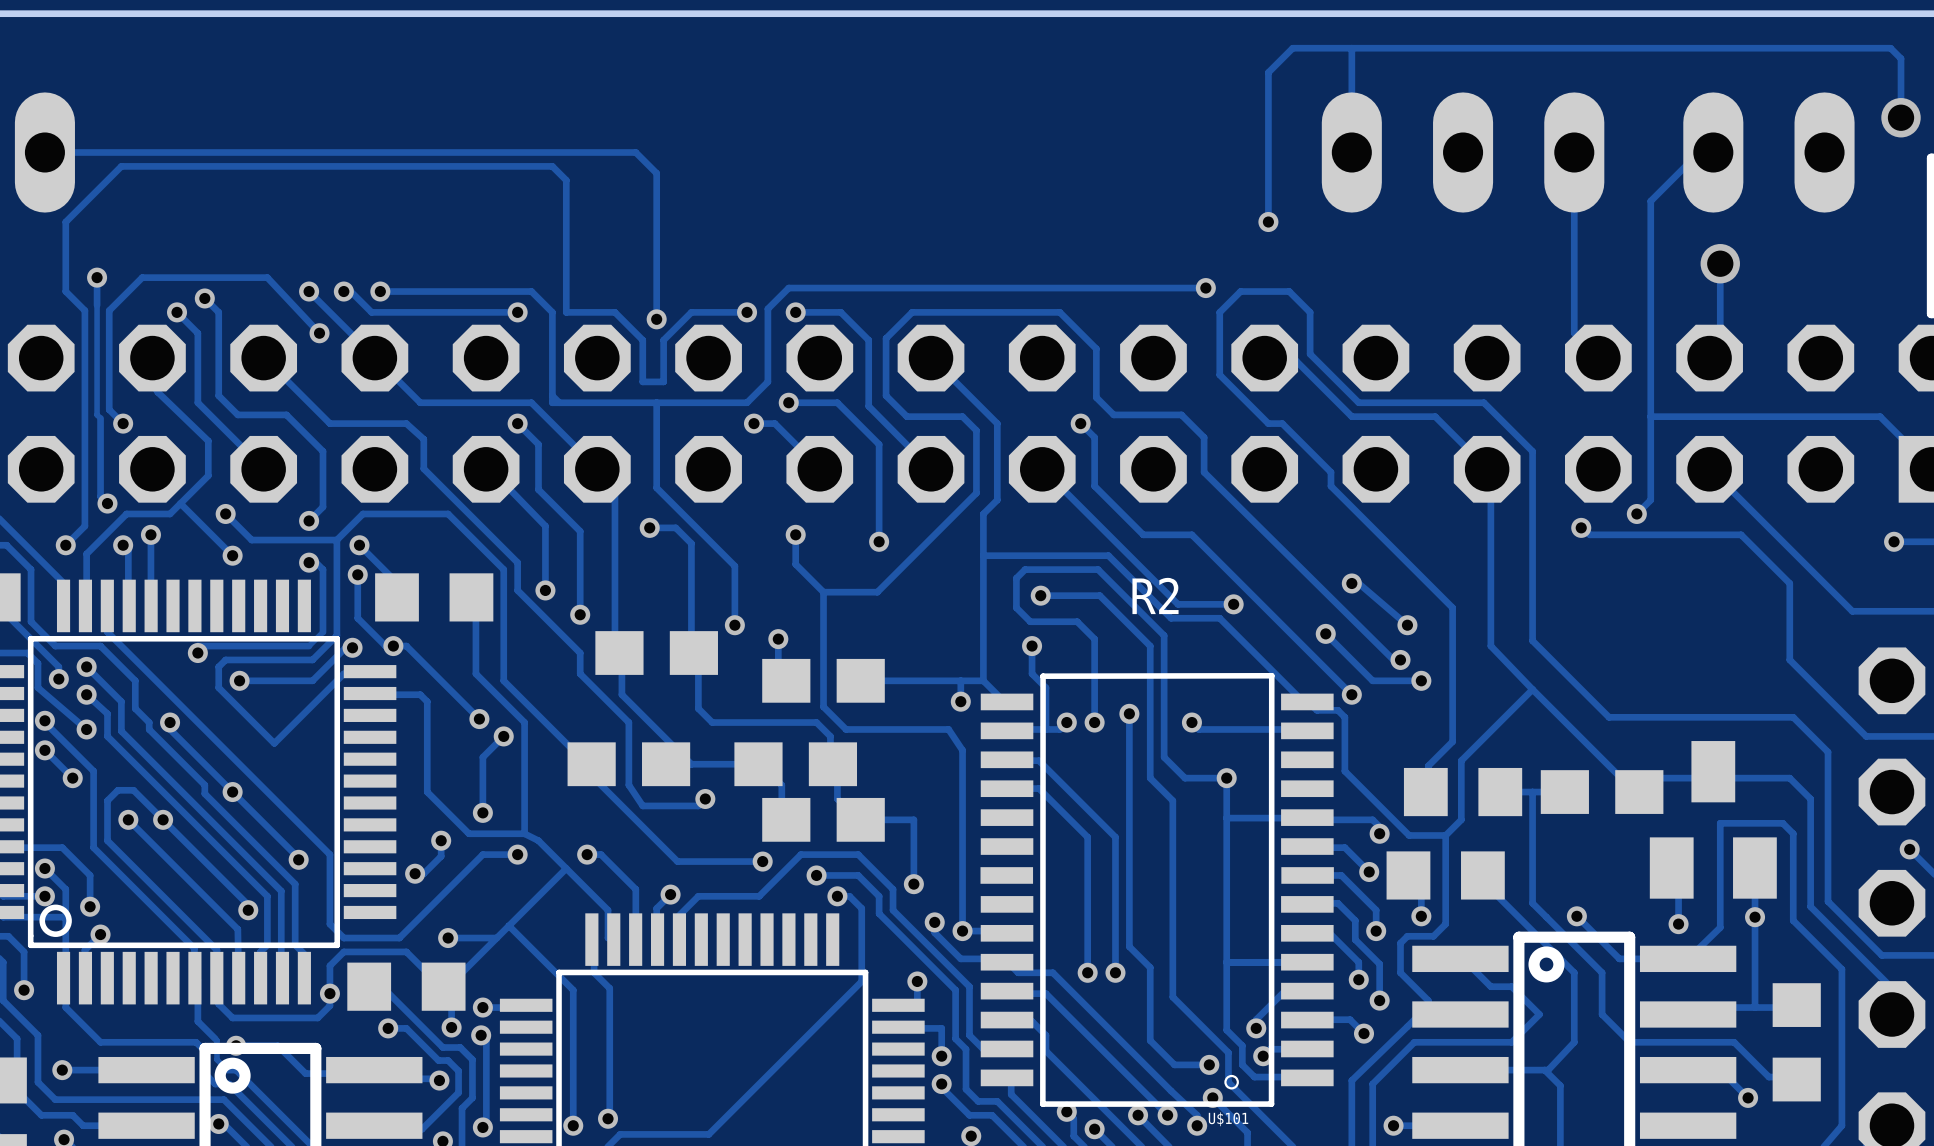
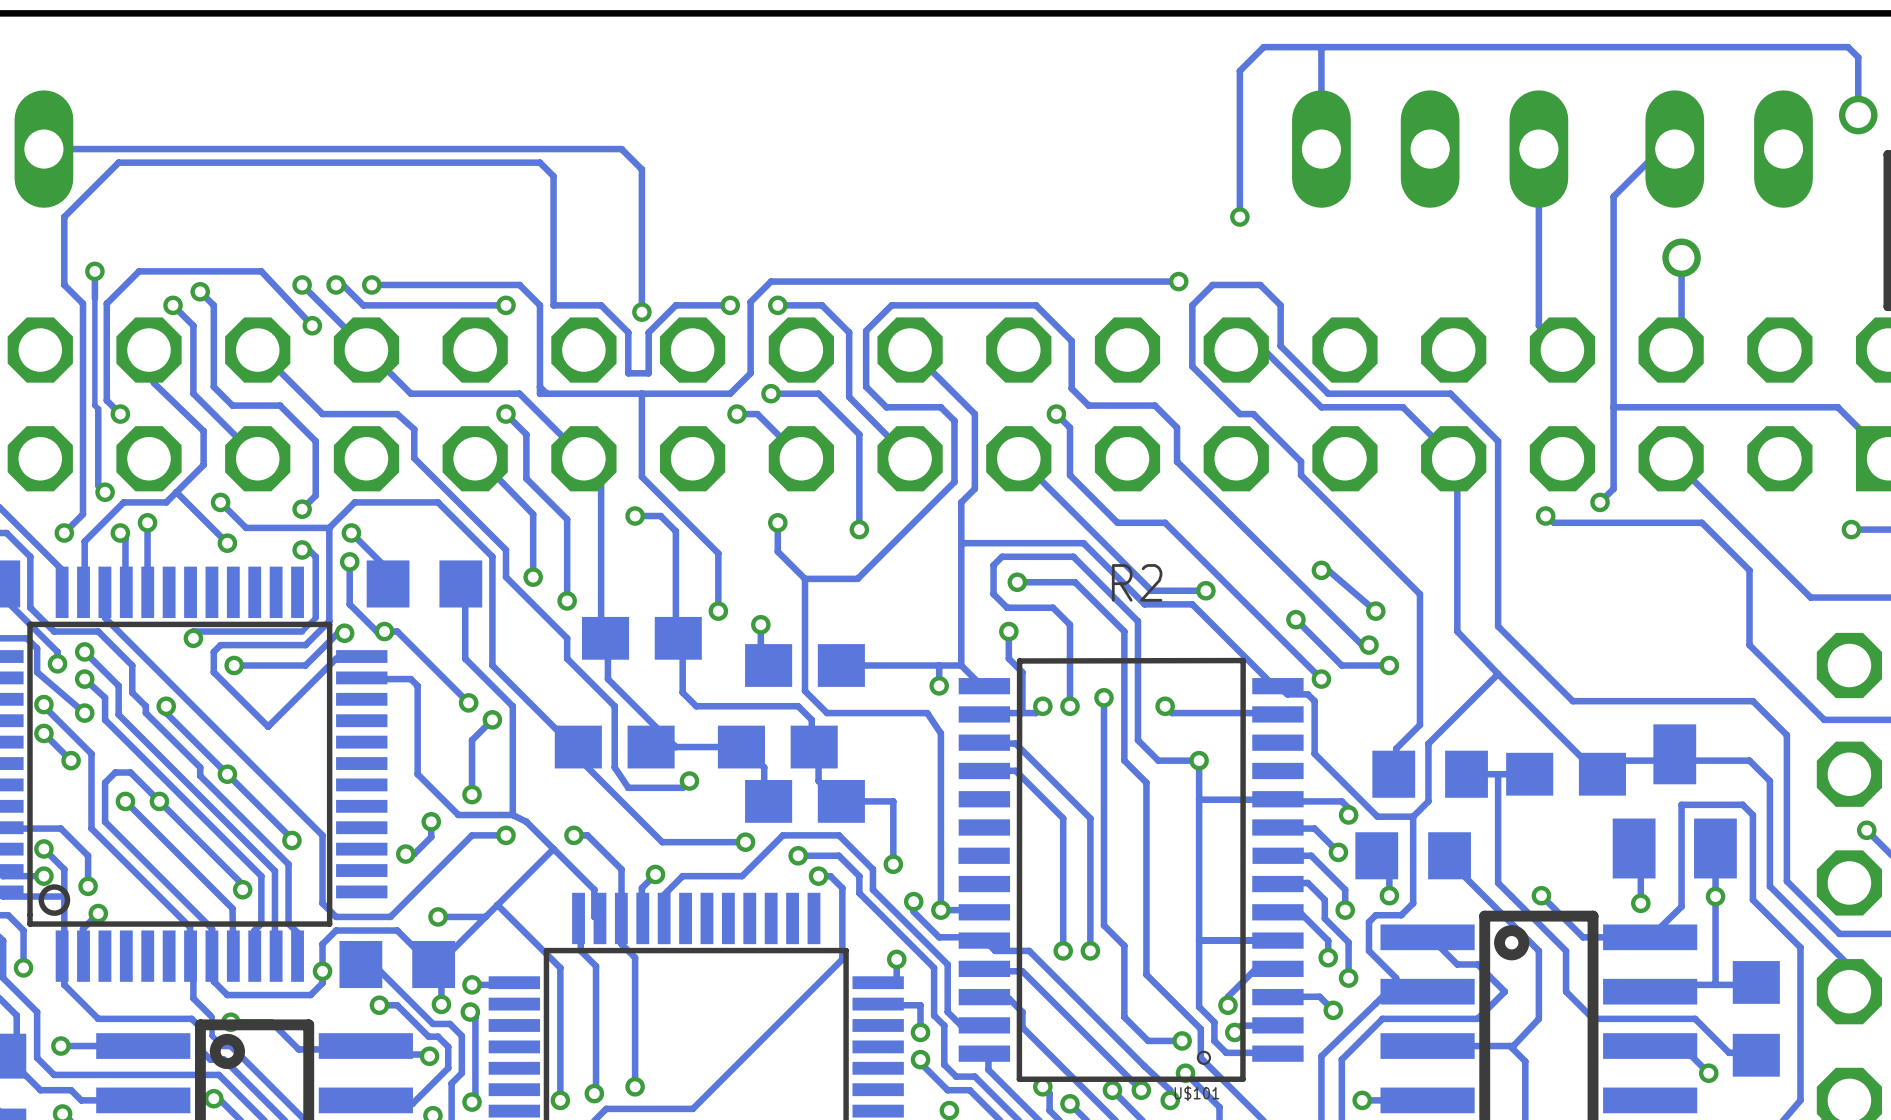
track: none -> (621, 918) (621, 944) (635, 957) (635, 1086)
via: none -> (635, 1086)

